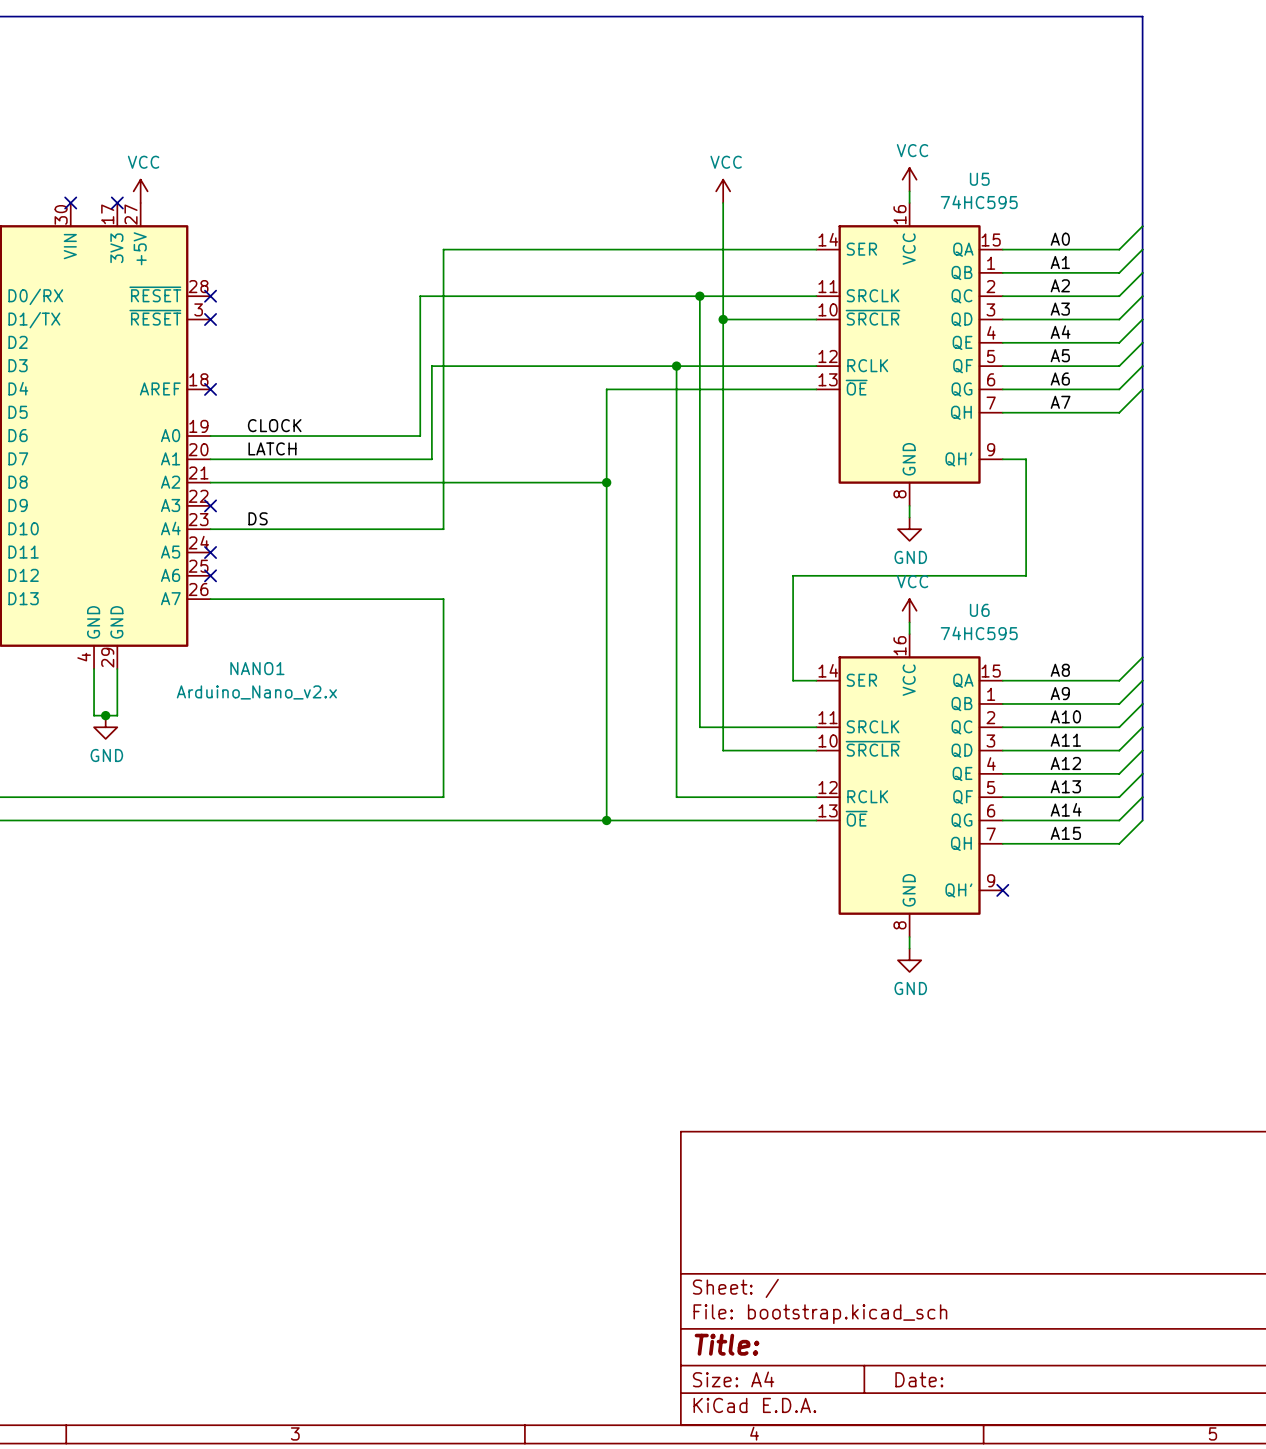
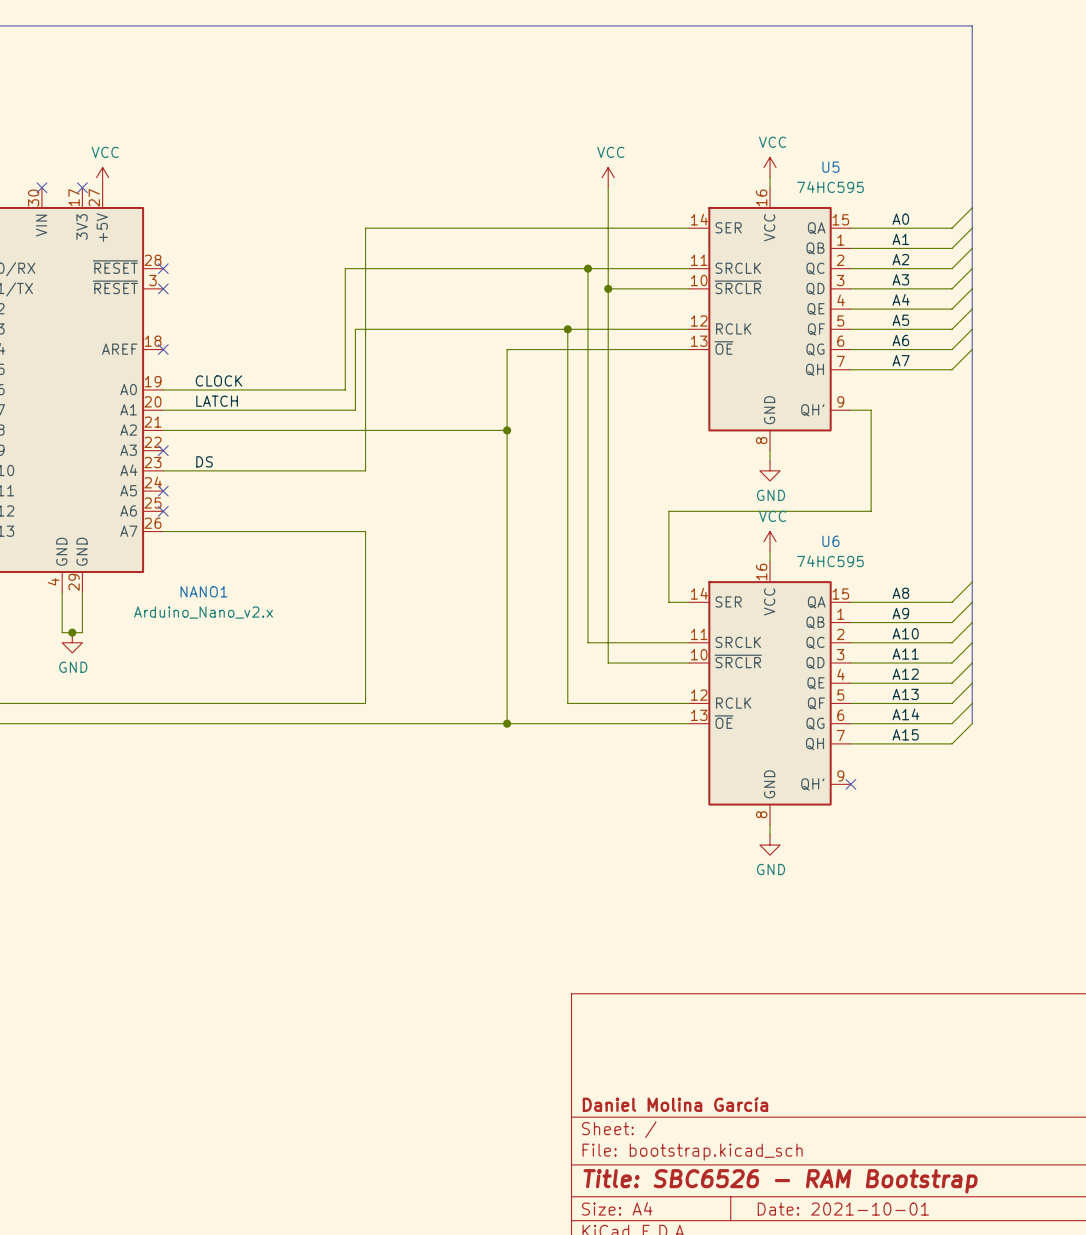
title block: none -> Daniel Molina García (675, 1104)
title block: Title: (727, 1344) -> Title: SBC6526 - RAM Bootstrap (780, 1181)
title block: Date: (919, 1379) -> Date: 2021-10-01 (843, 1209)

